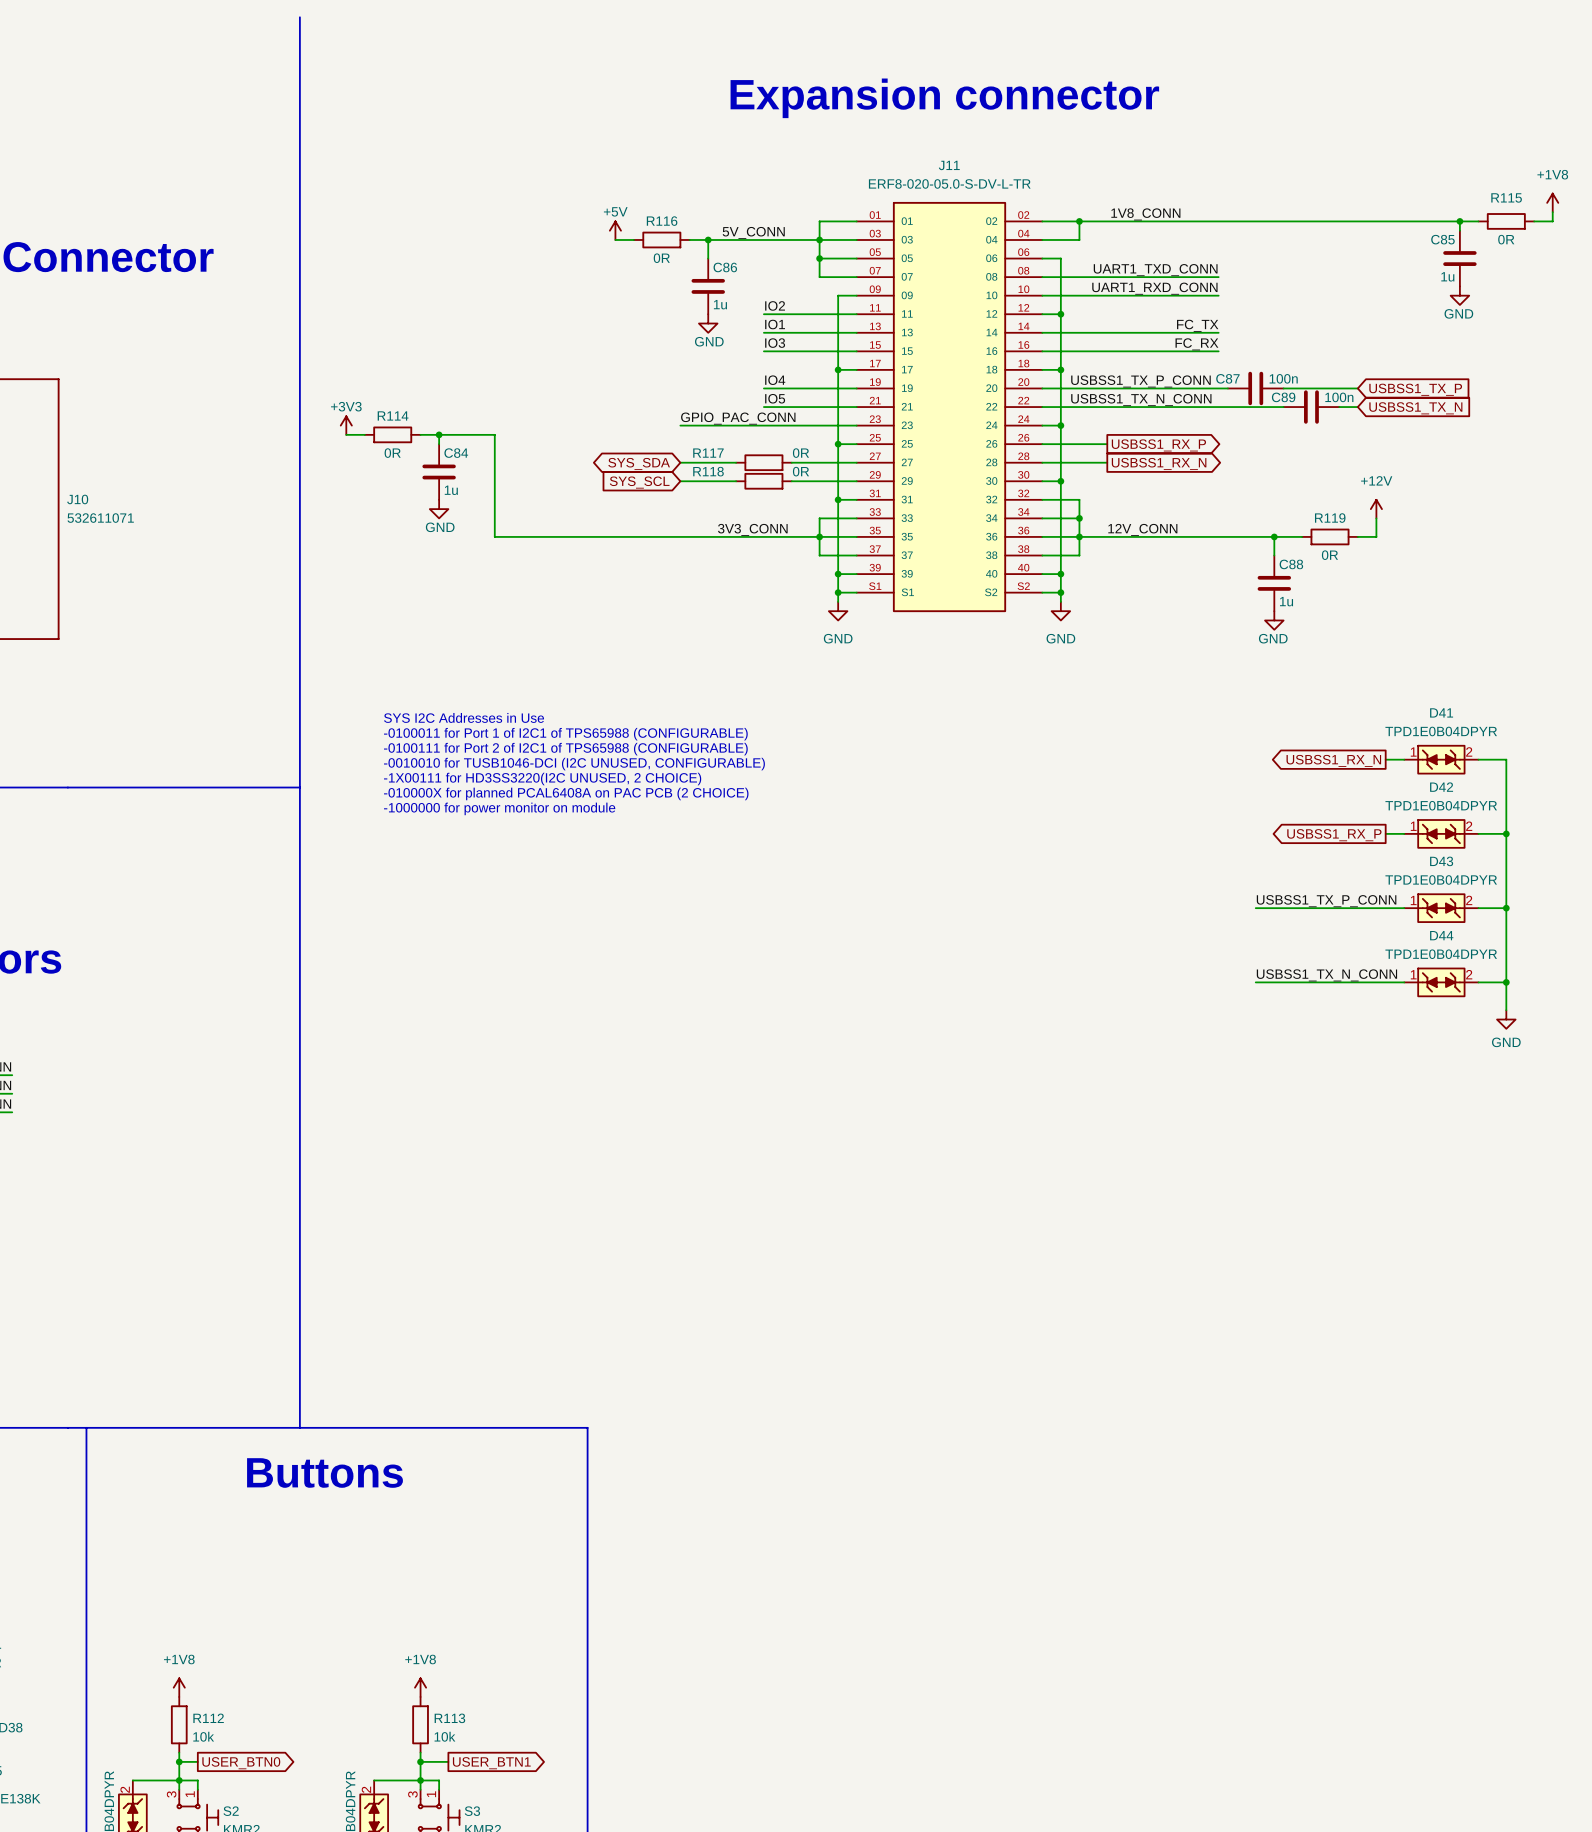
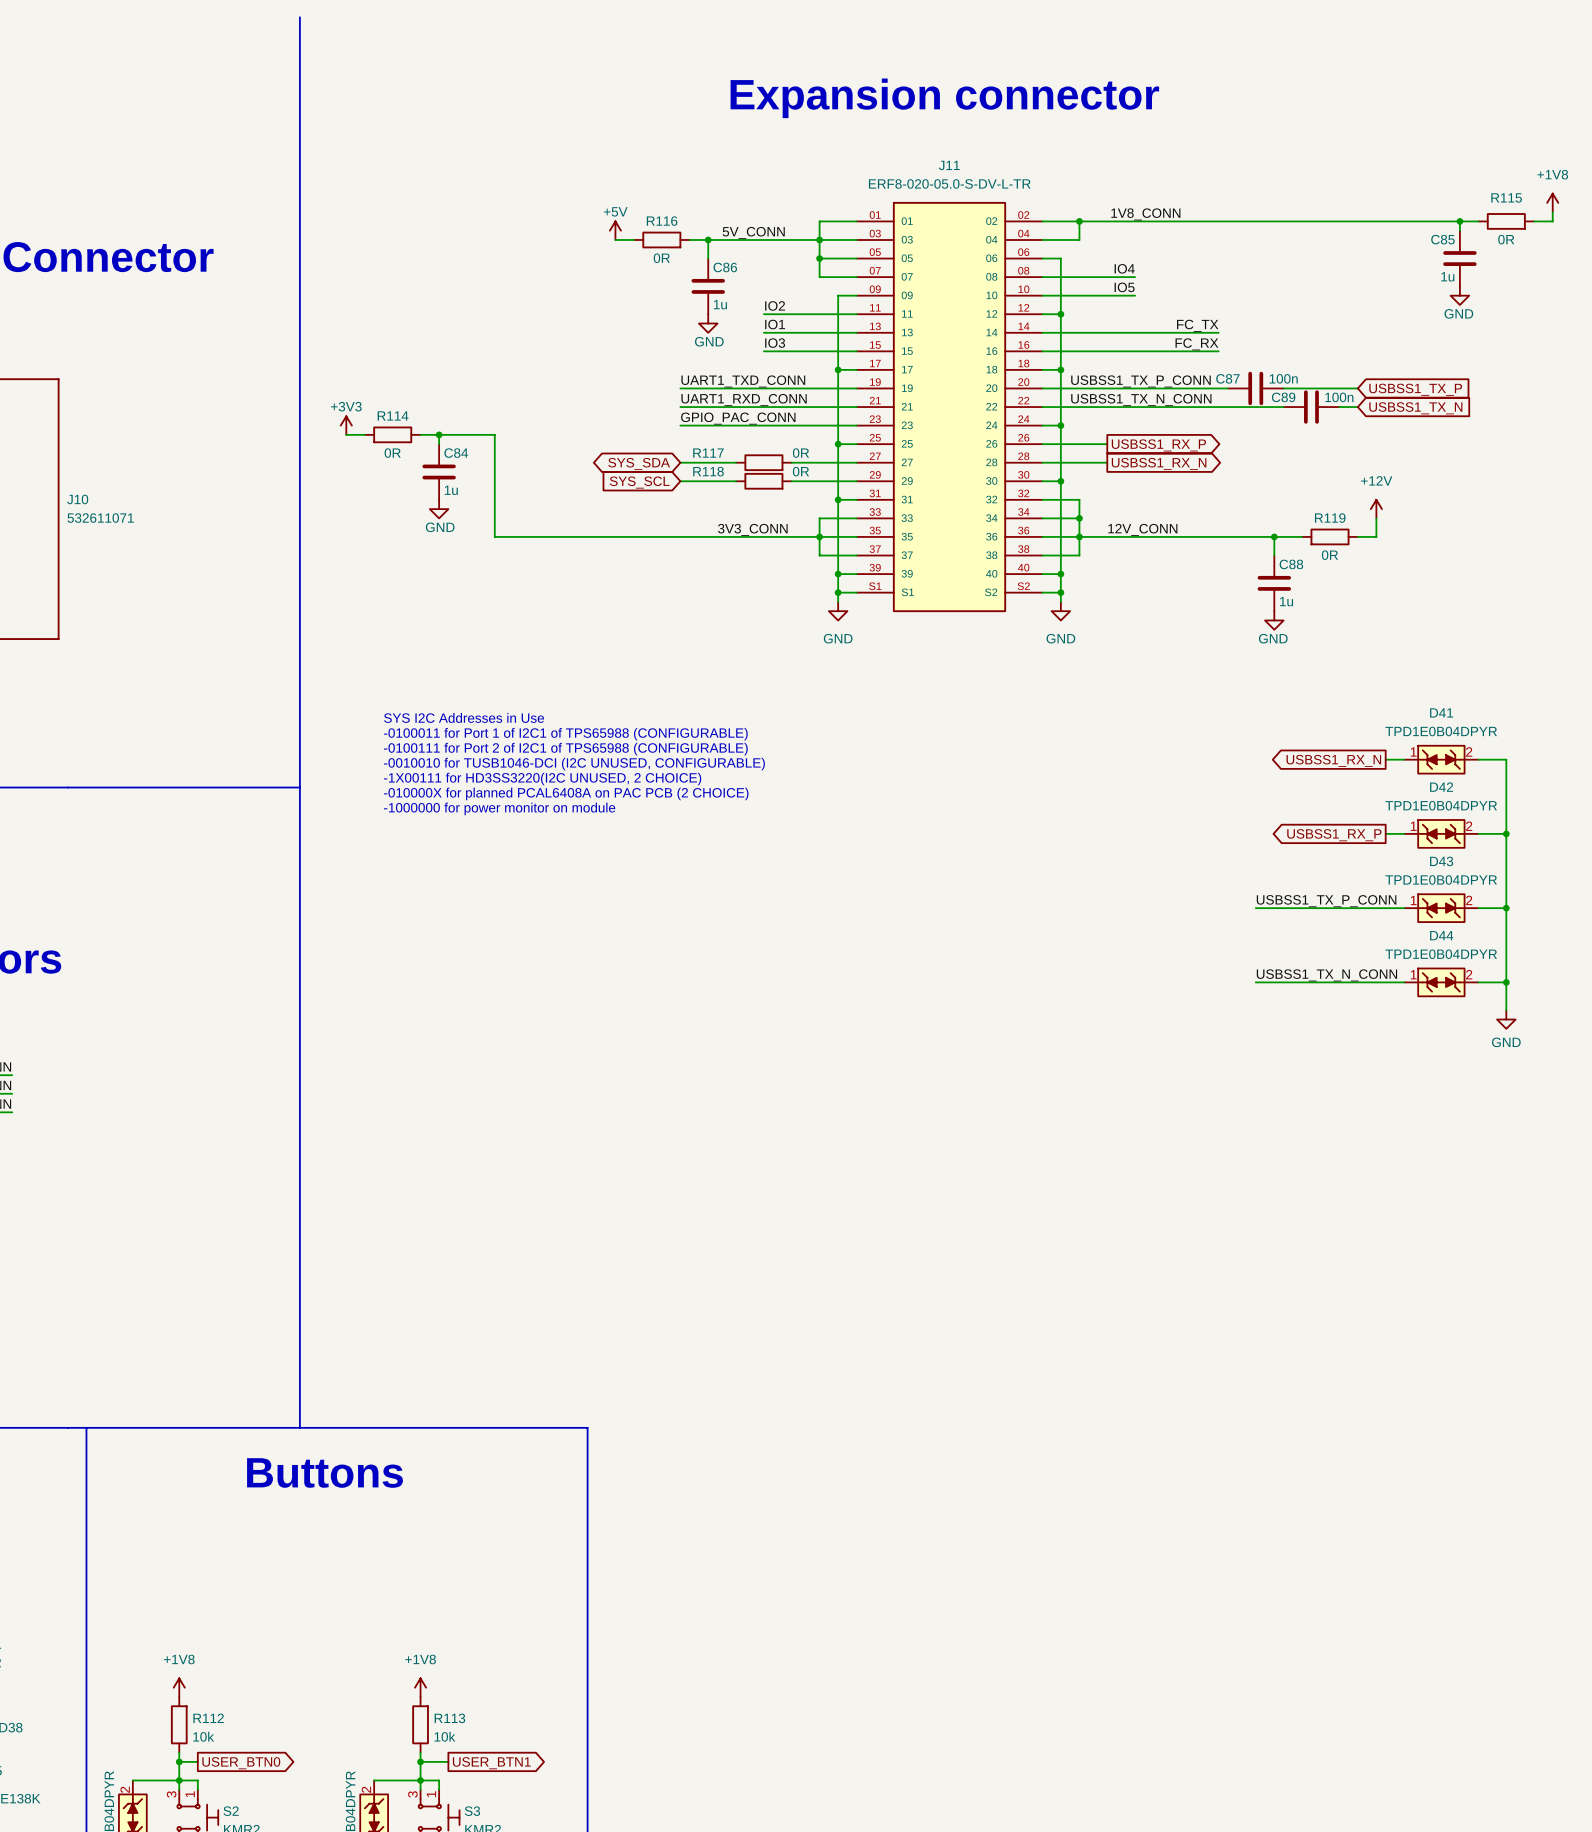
label: none -> IO4 (1124, 268)
label: UART1_TXD_CONN (1155, 270) -> none
wire: (1135, 277) (1218, 277) -> none
label: none -> IO5 (1124, 287)
label: UART1_RXD_CONN (1154, 288) -> none
wire: (1135, 295) (1218, 295) -> none
label: IO4 (775, 380) -> none
label: none -> UART1_TXD_CONN (743, 381)
wire: none -> (680, 388) (763, 388)
label: IO5 (775, 398) -> none
label: none -> UART1_RXD_CONN (744, 400)
wire: none -> (680, 407) (763, 407)

